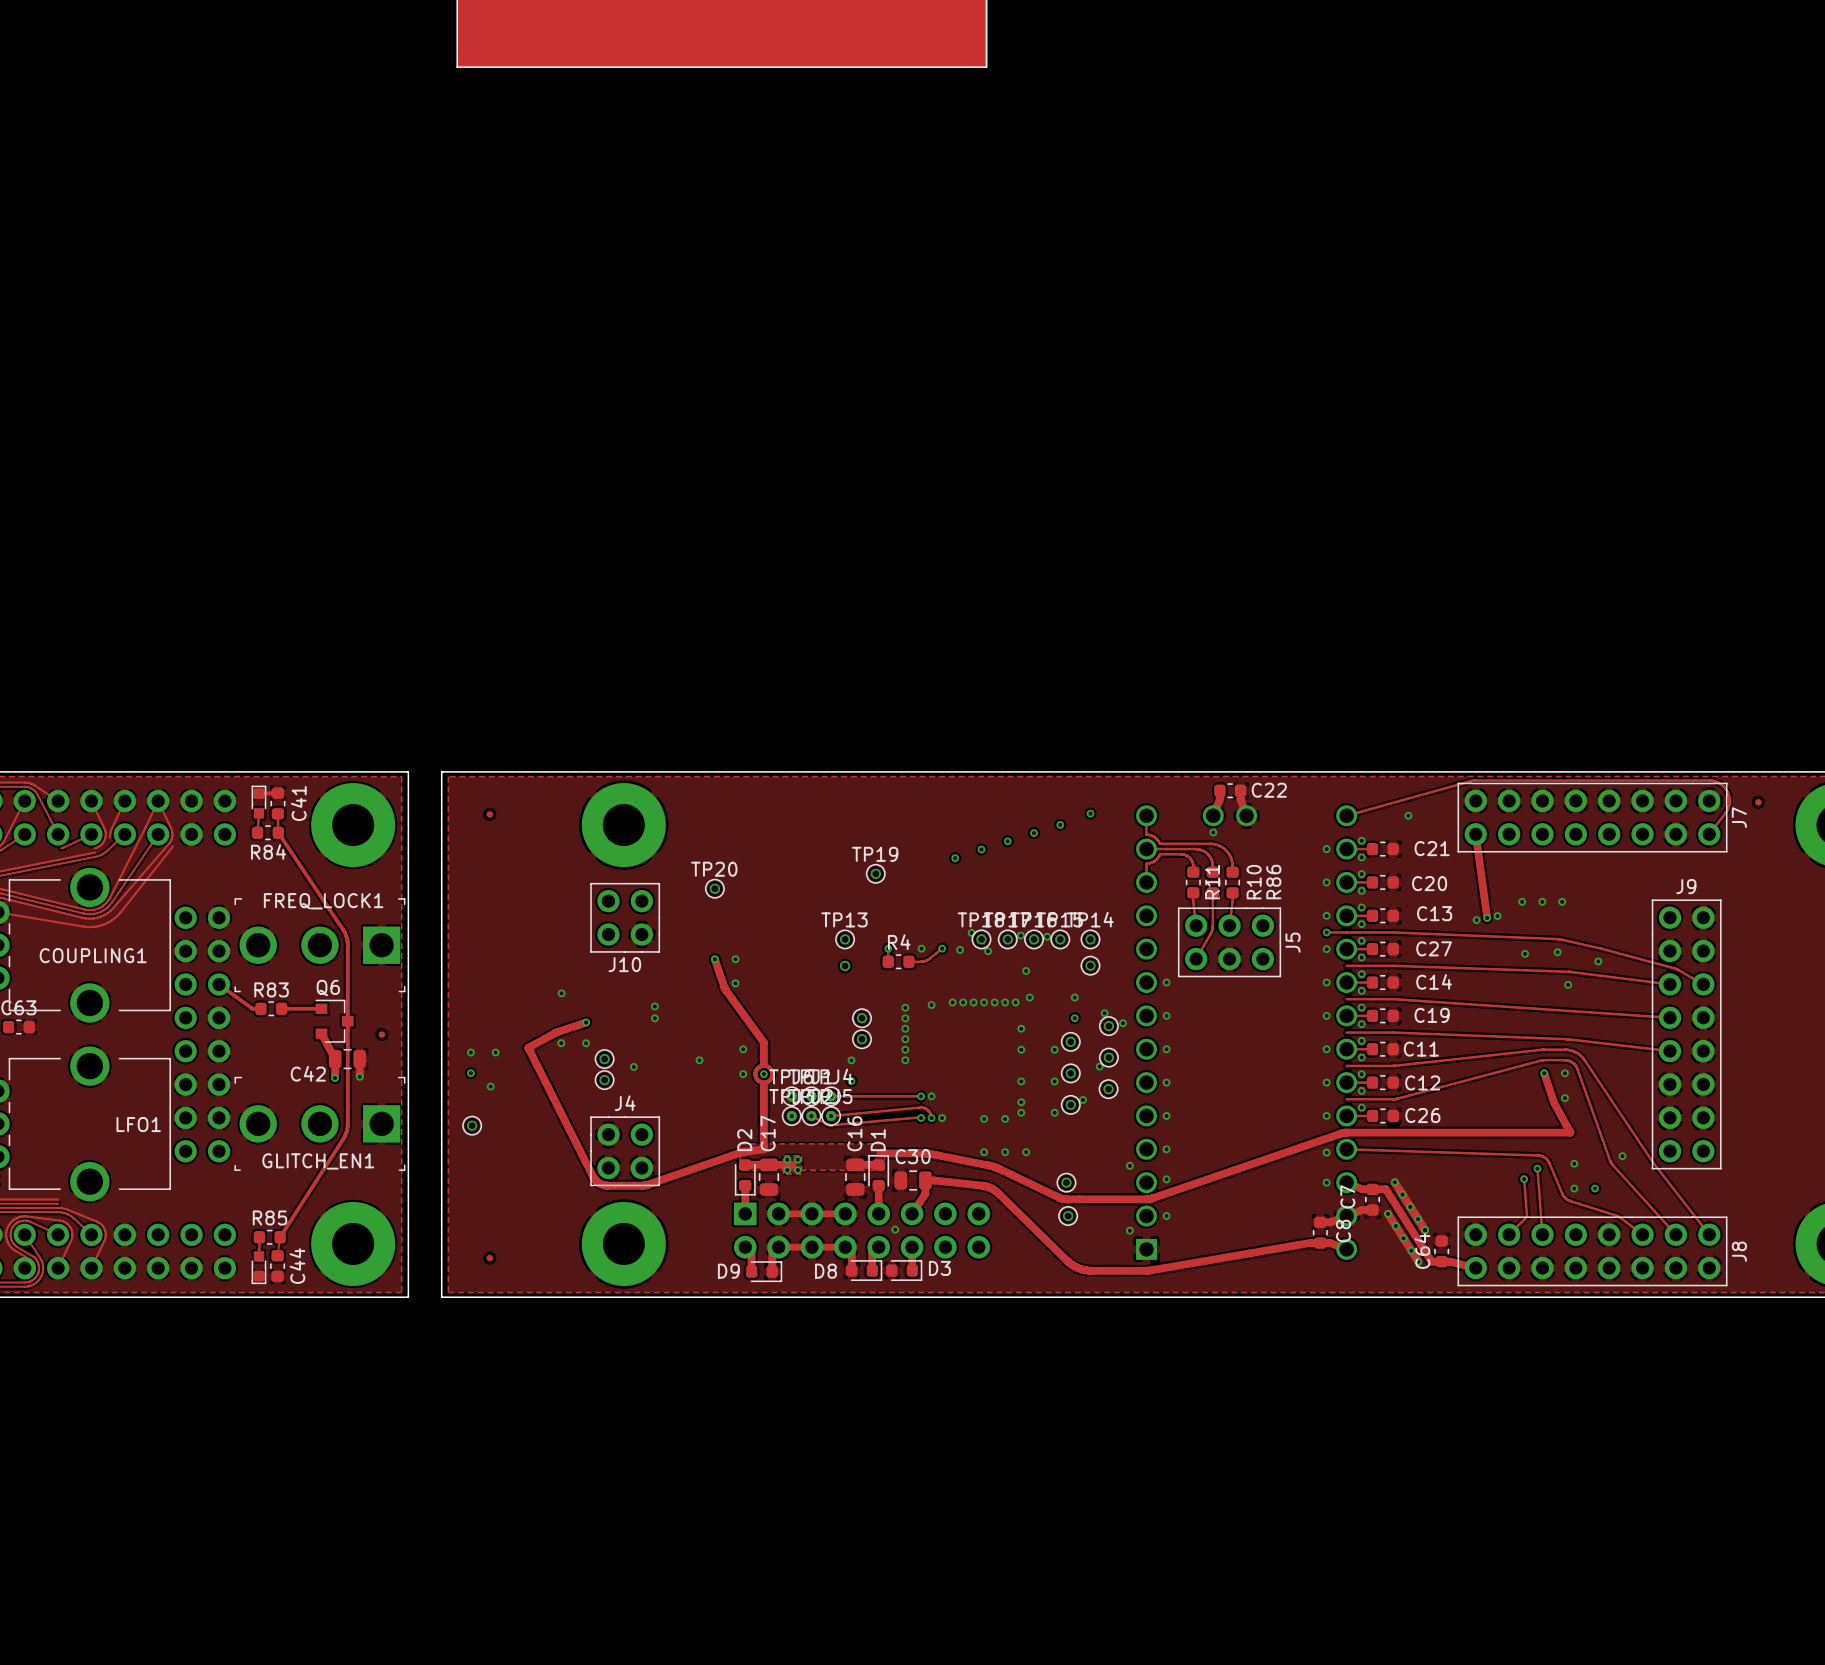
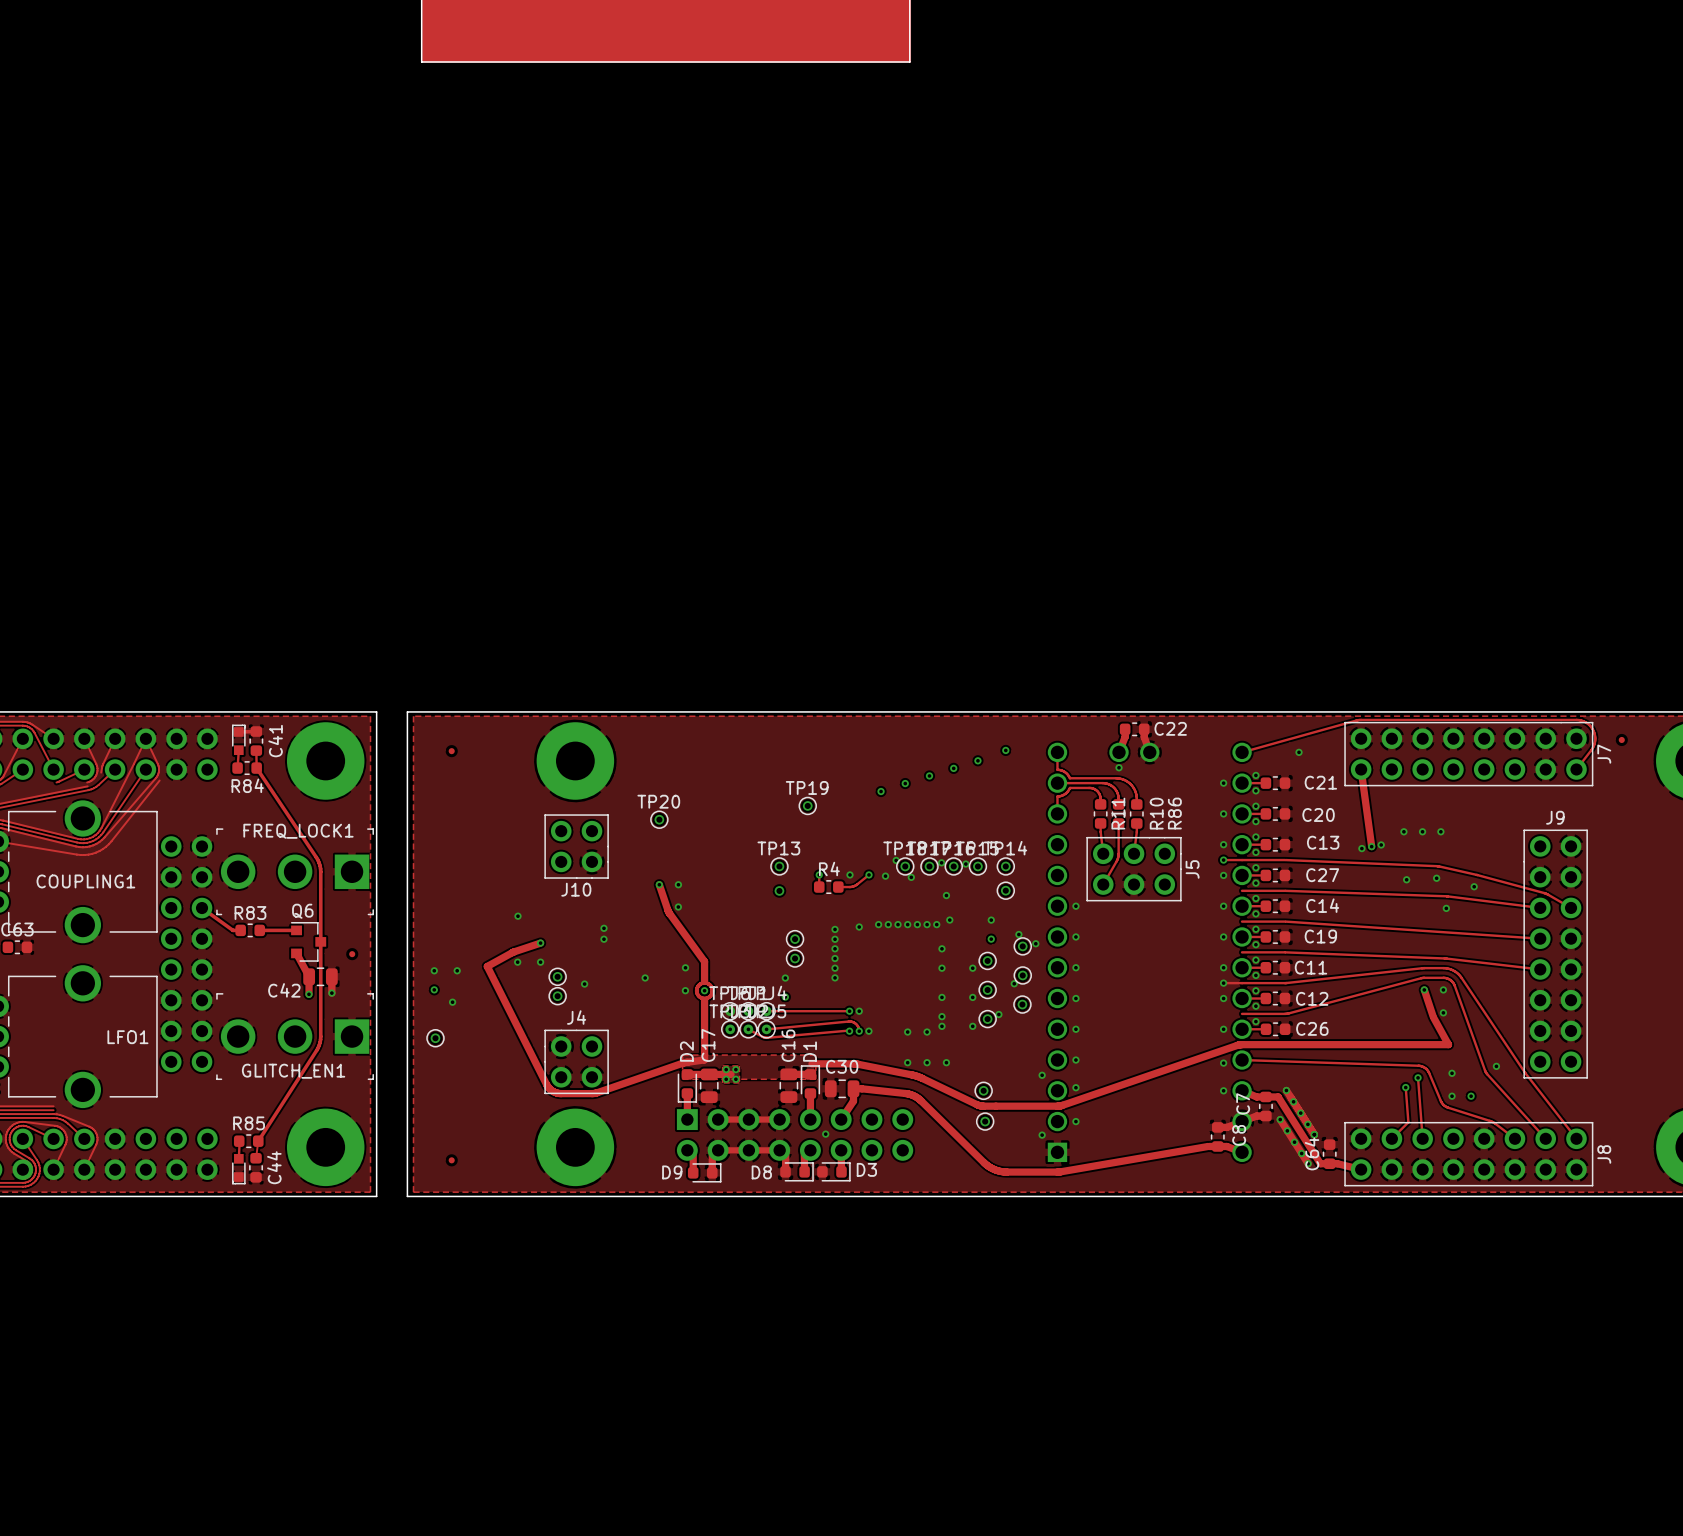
track: none -> (1223, 983) (1242, 983)
via: none -> (1223, 983)

